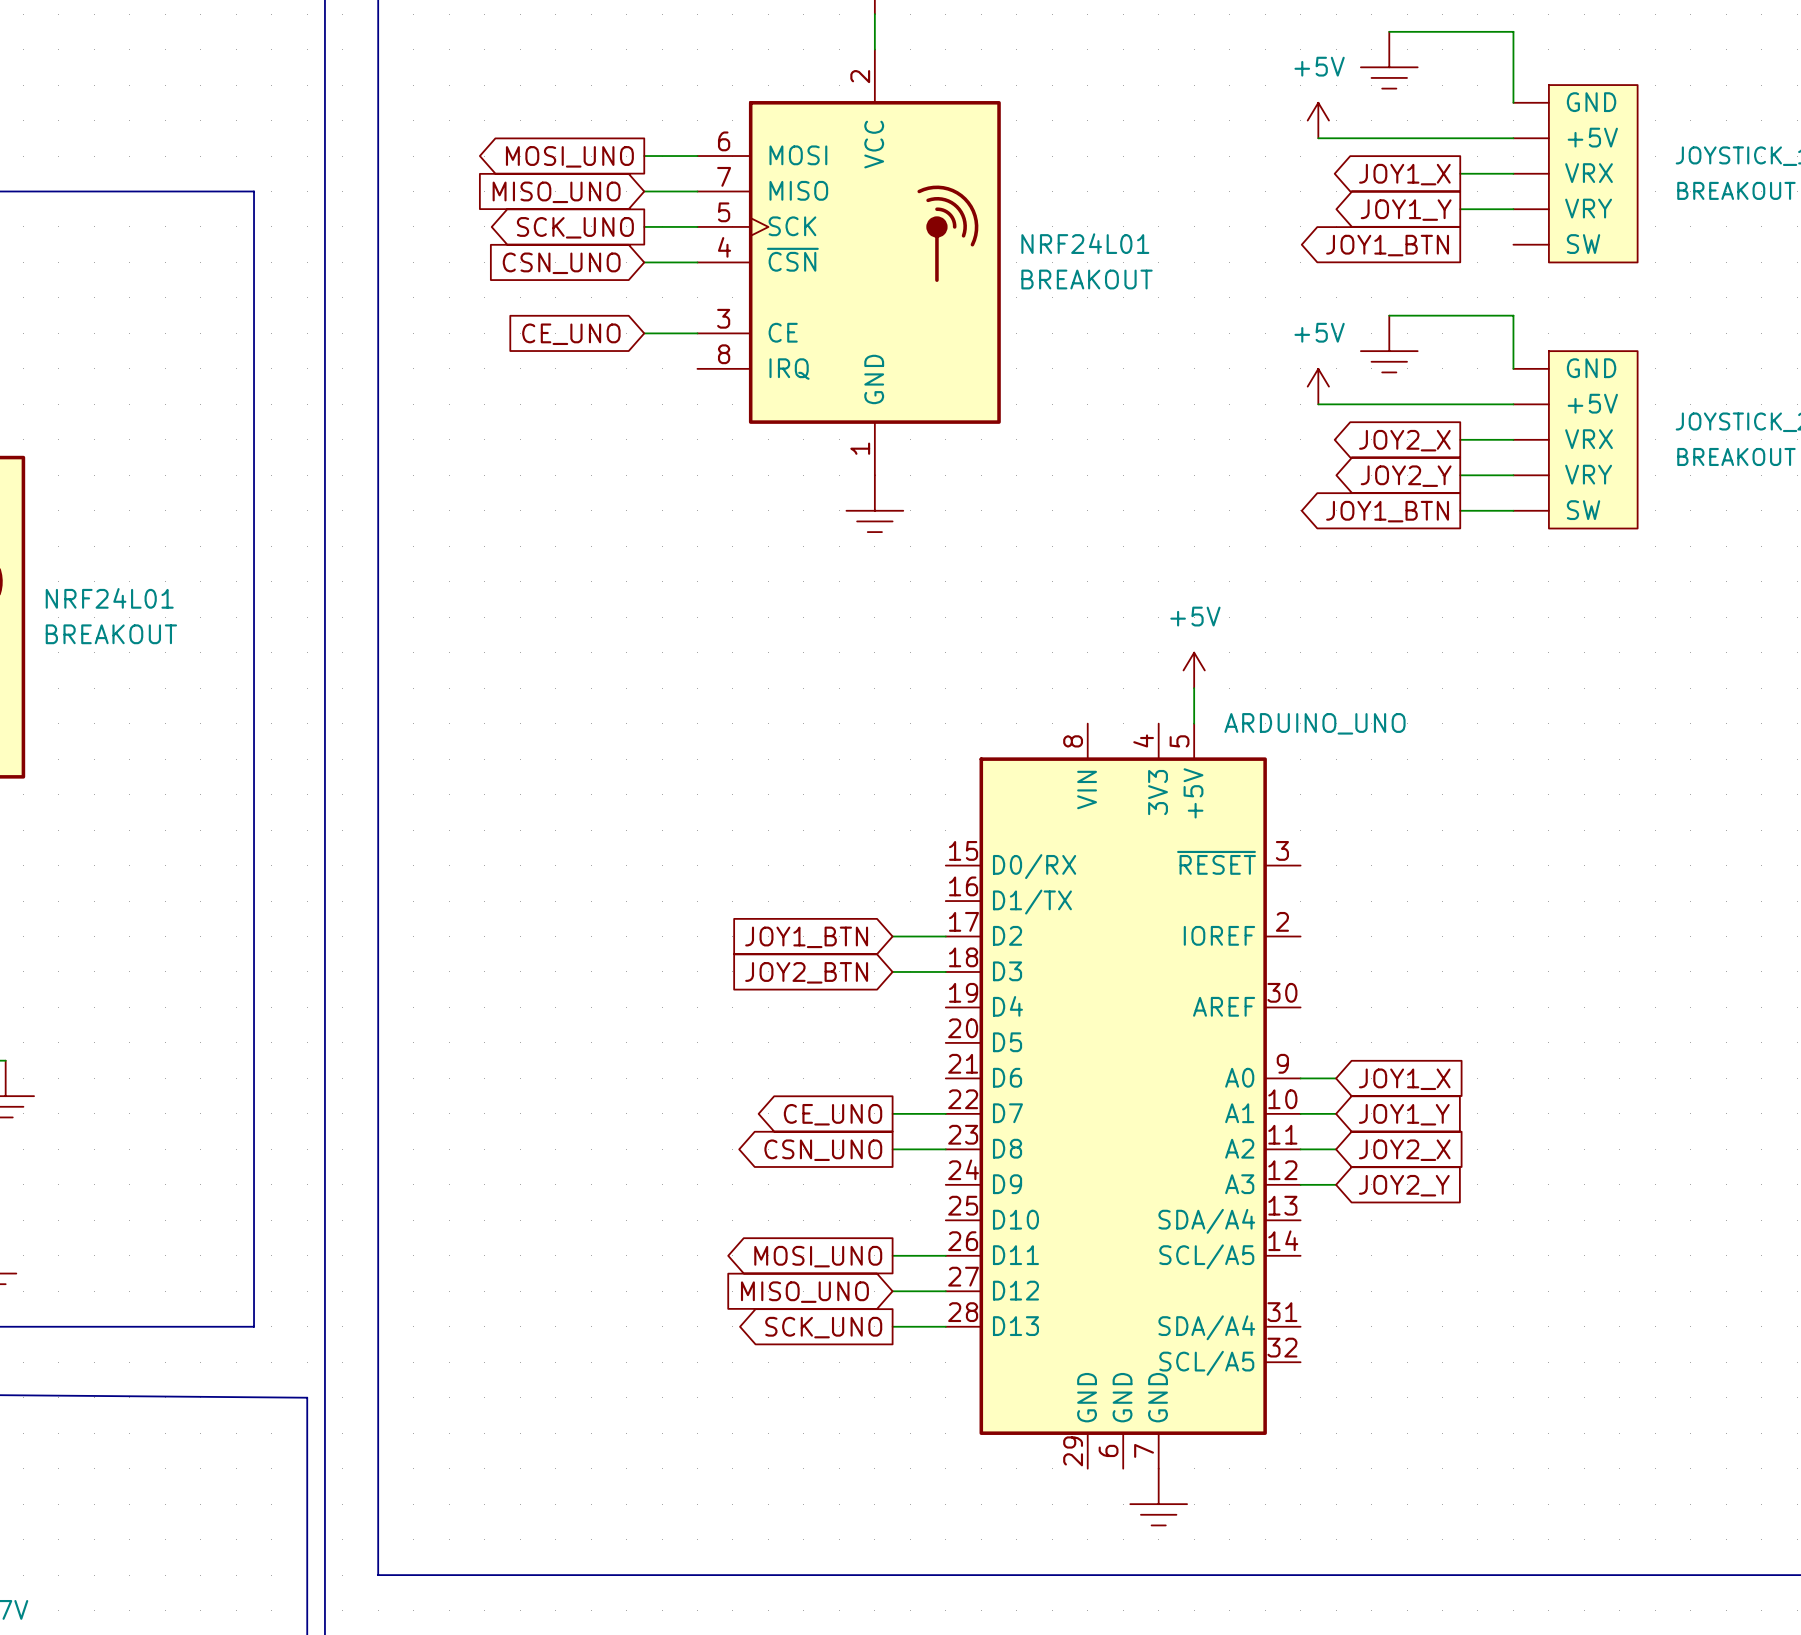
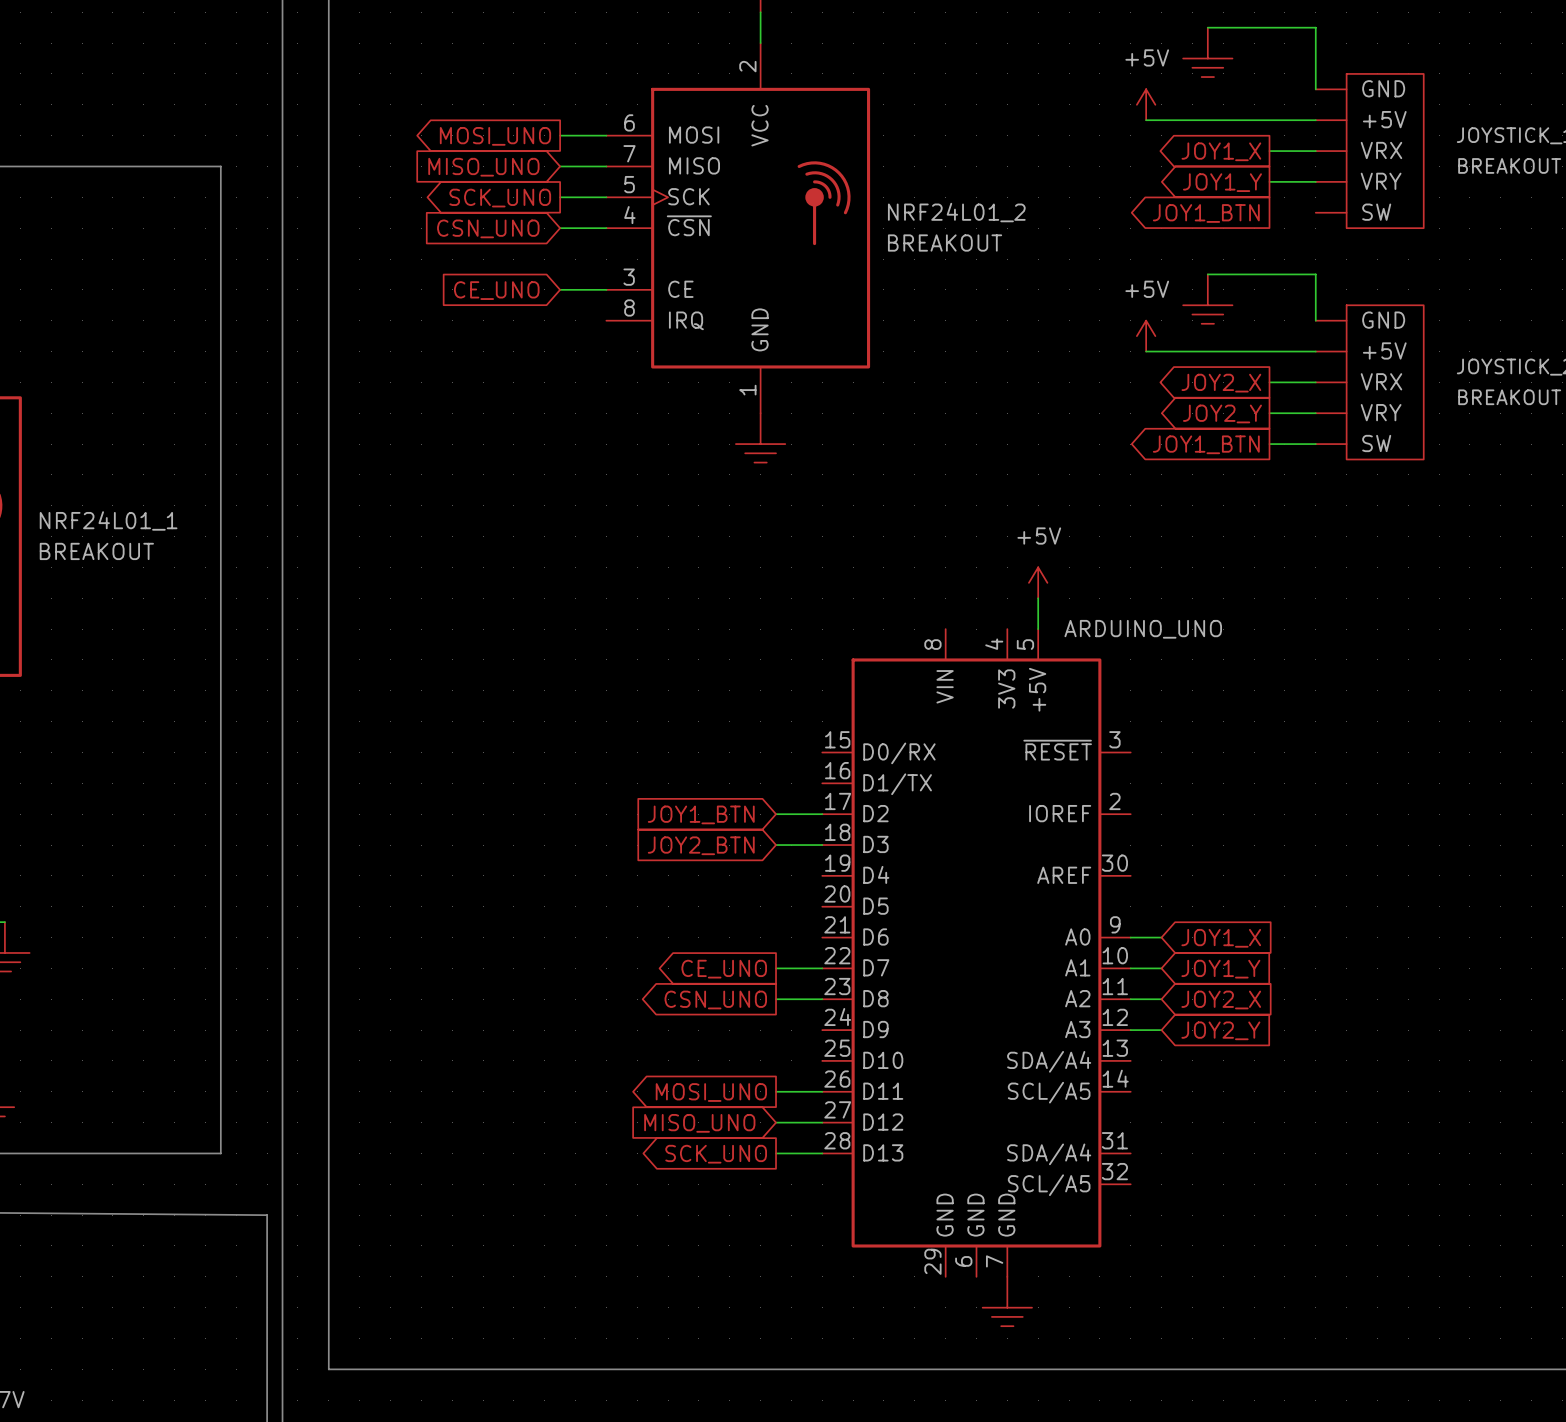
NRF24L01 name: NRF24L01 (1085, 243) -> NRF24L01_2 (956, 212)
NRF24L01 name: NRF24L01 (109, 598) -> NRF24L01_1 (108, 520)

